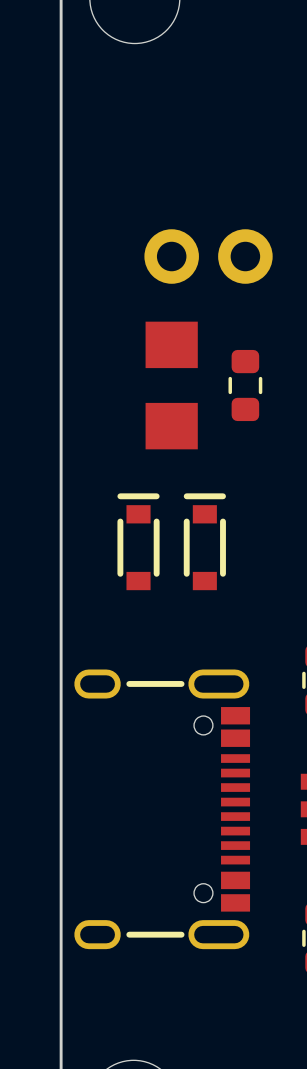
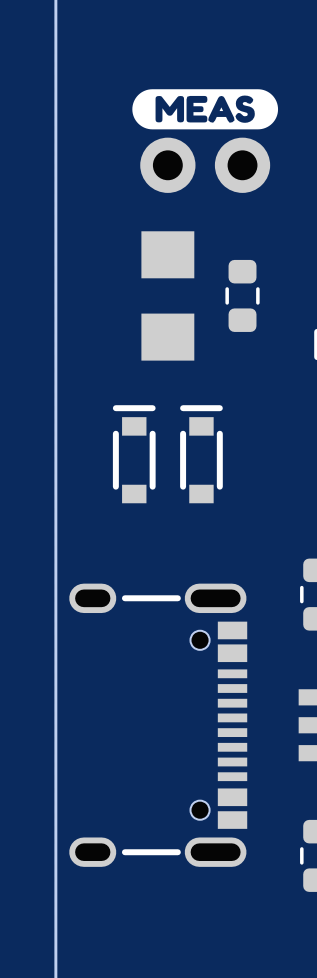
drawing: none -> [132, 89, 279, 130]

